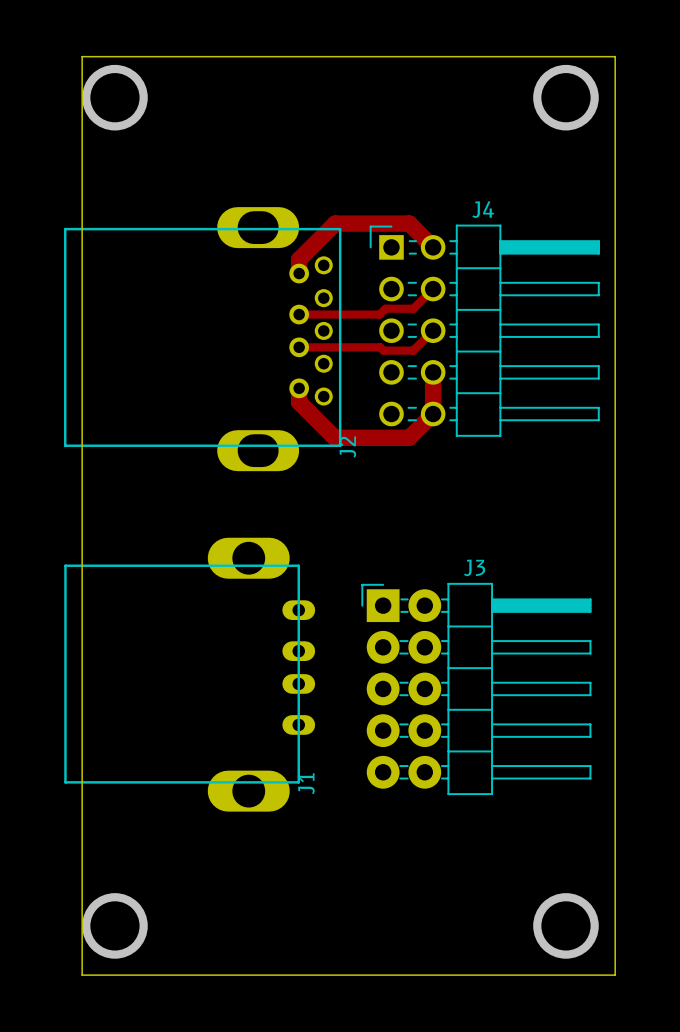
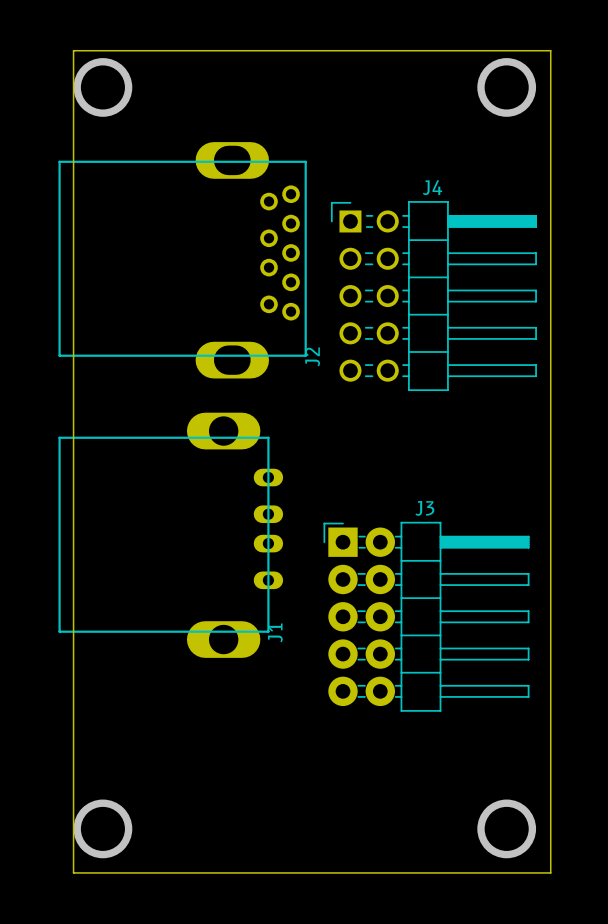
J2 footprint: [63, 207, 342, 472] -> [58, 142, 307, 379]
track: (433, 247) (409, 223) (335, 223) (299, 259) (299, 273) -> none
track: (433, 289) (413, 308) (385, 308) (379, 314) (299, 314) -> none
track: (433, 330) (413, 350) (383, 350) (380, 347) (299, 347) -> none
track: (433, 372) (433, 414) (409, 437) (334, 437) (299, 402) (299, 388) -> none
J1 position: (189, 674) -> (170, 535)

